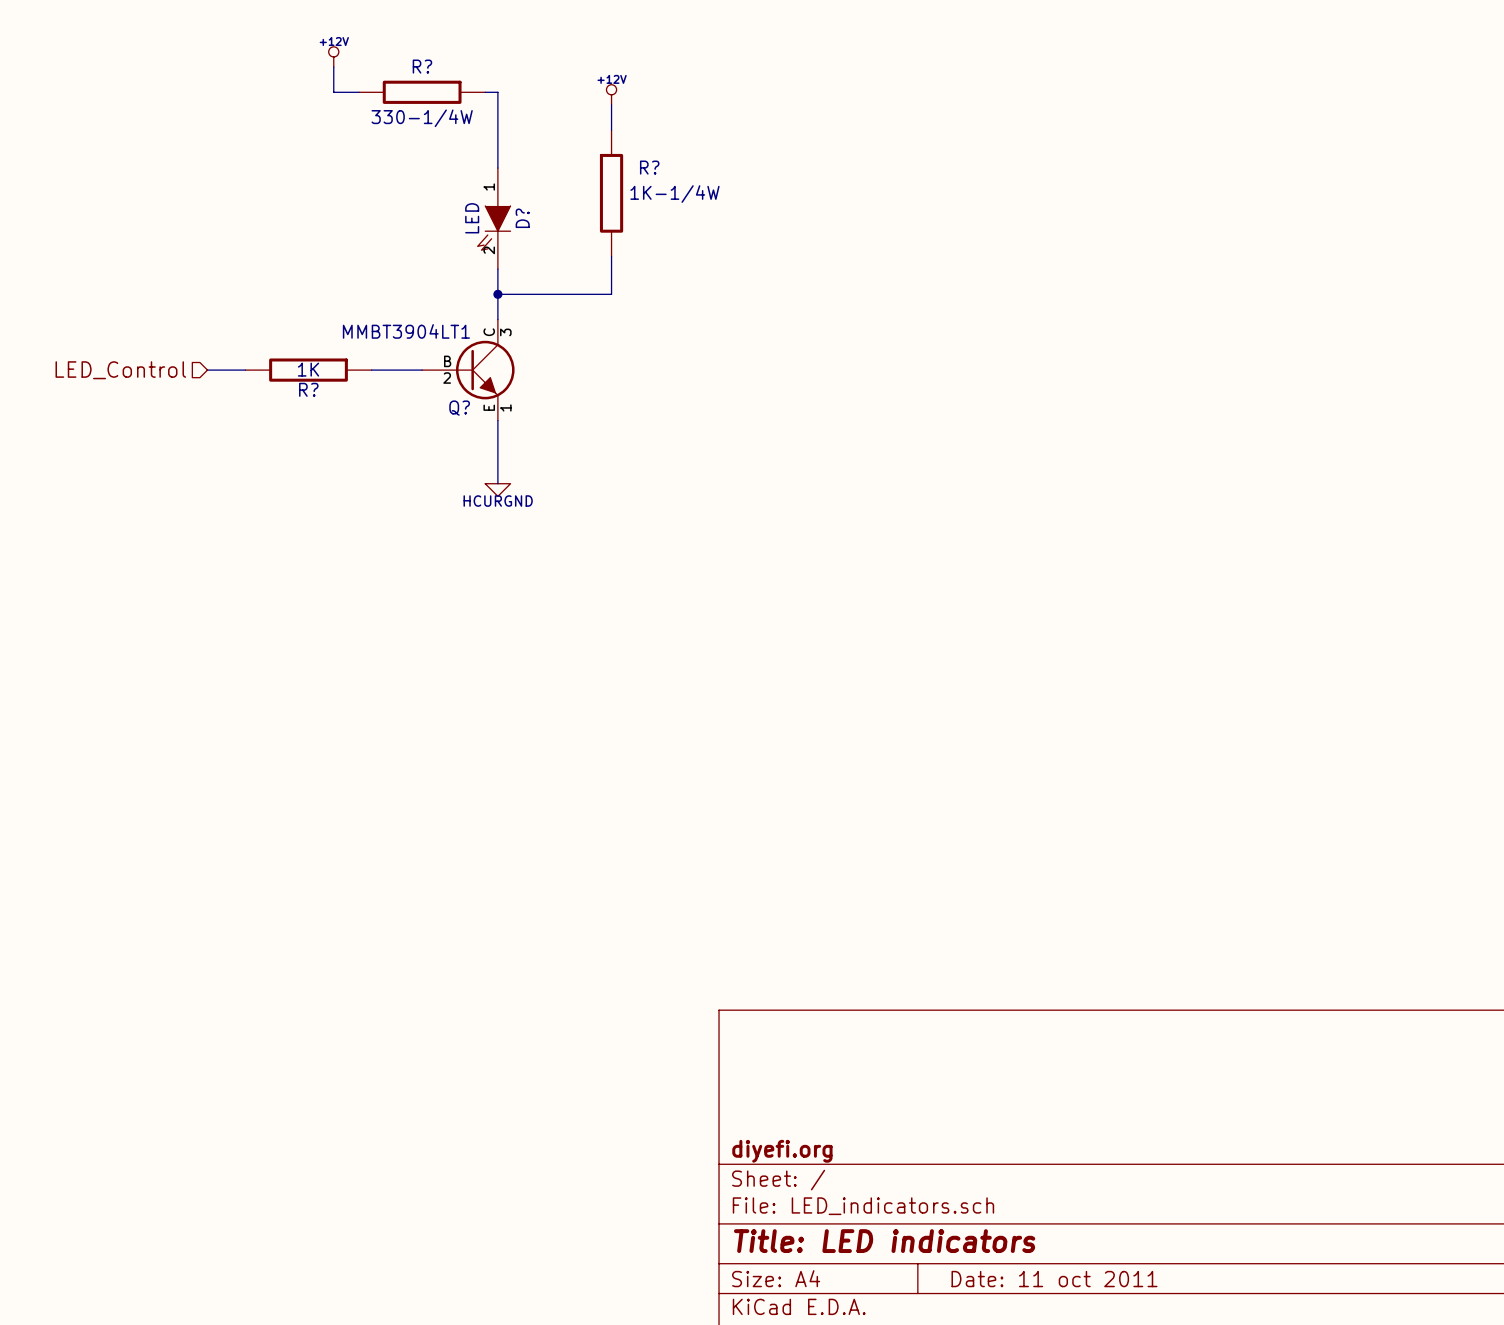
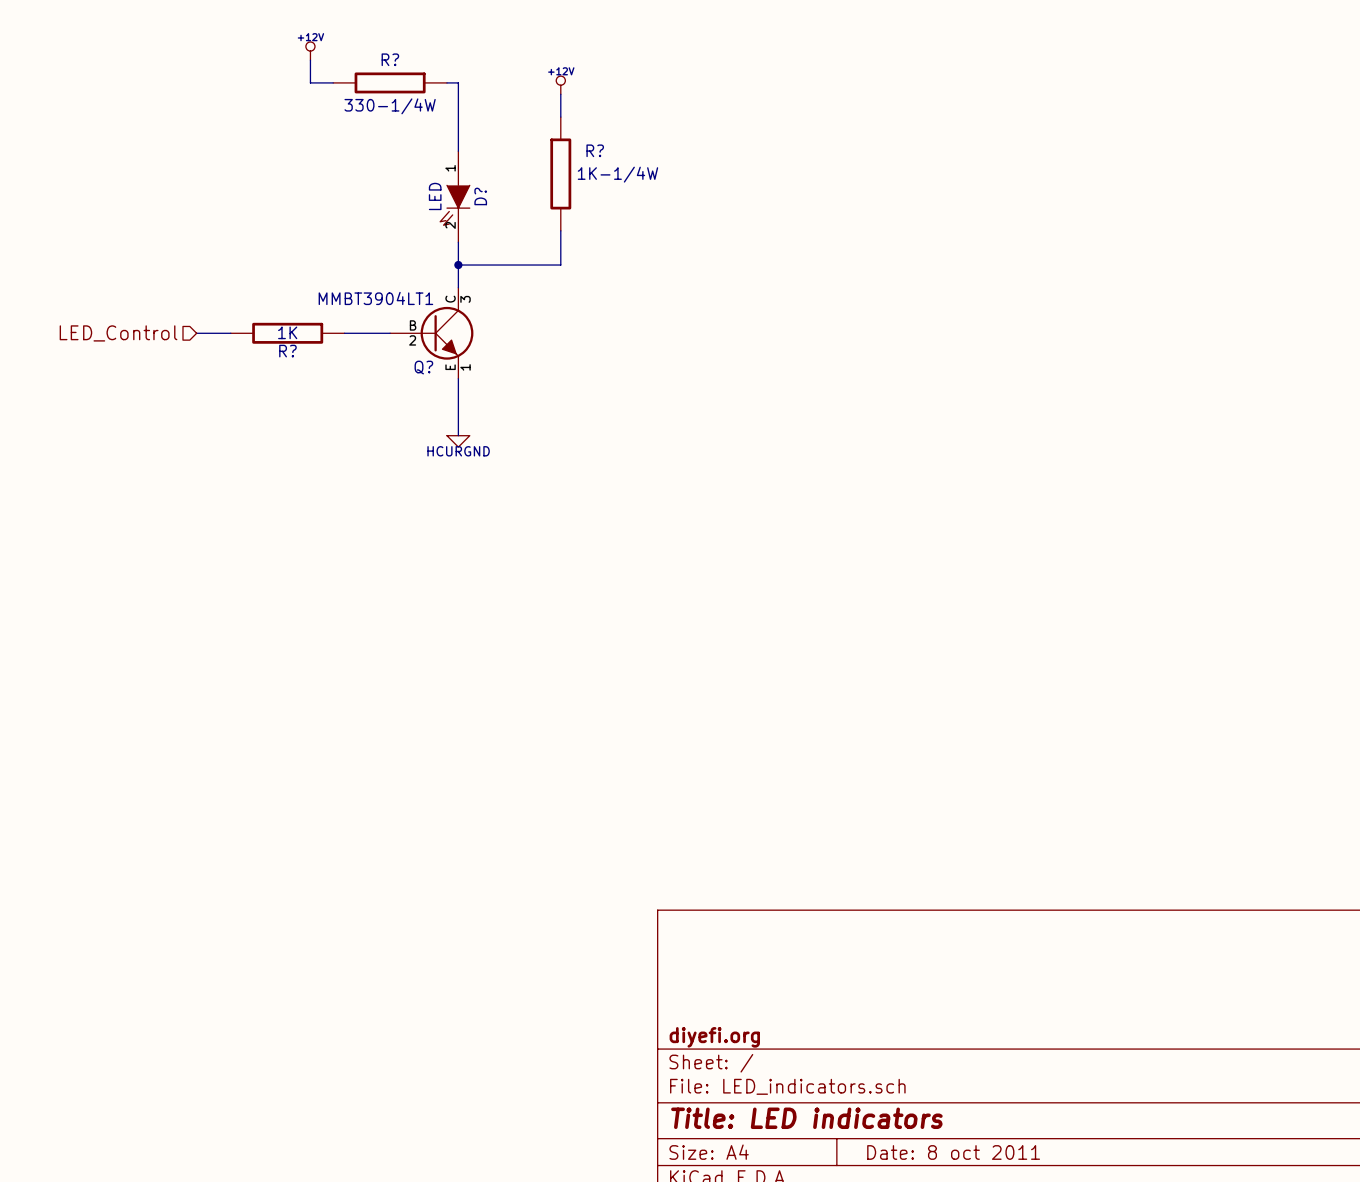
title block: Date: 11 oct 2011 (1054, 1279) -> Date: 8 oct 2011 (953, 1152)

